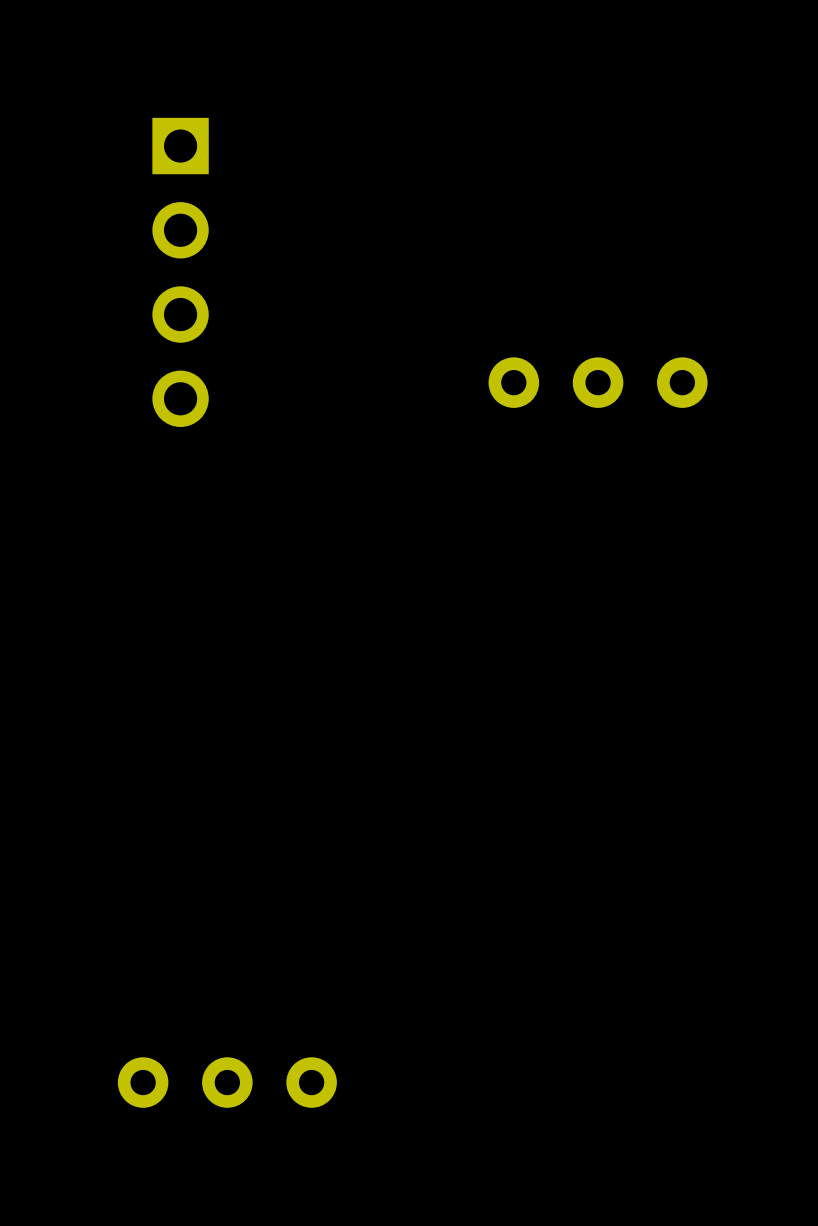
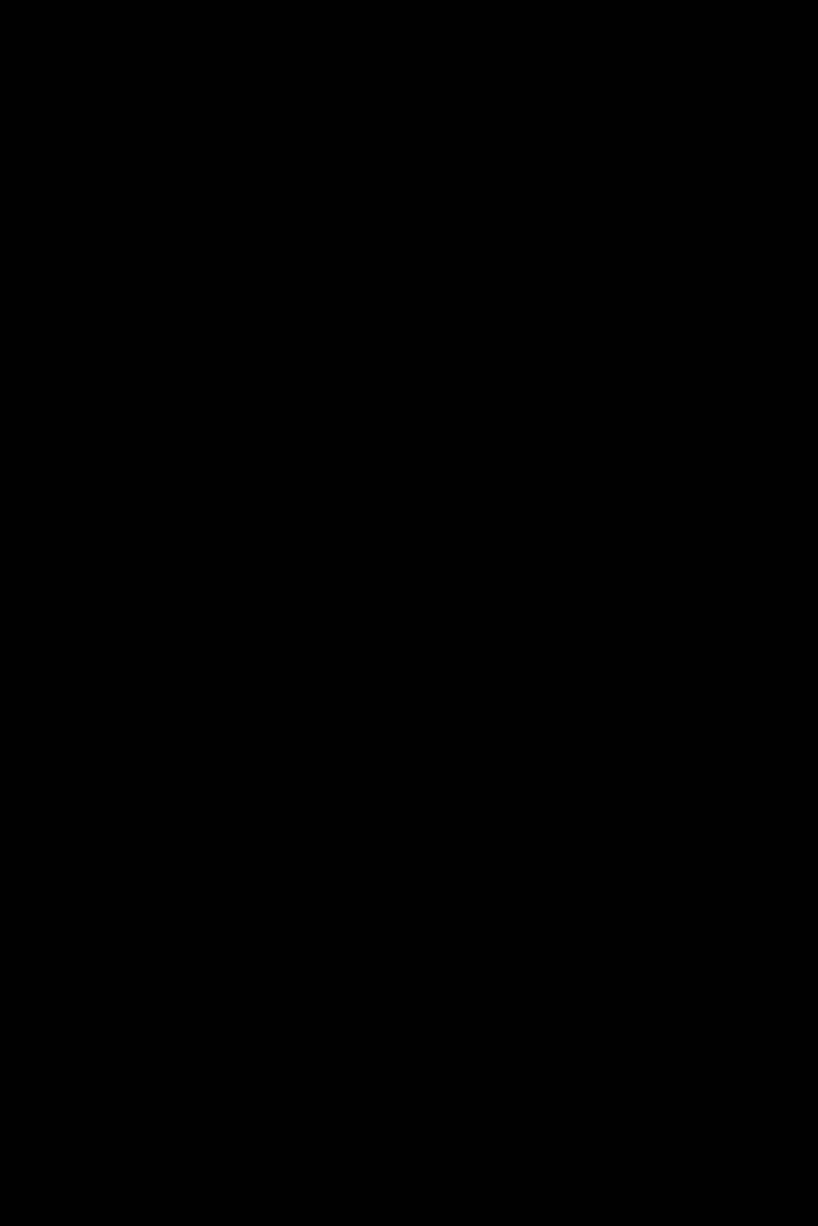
part: (180, 272) -> none
part: (598, 382) -> none
part: (227, 1082) -> none

